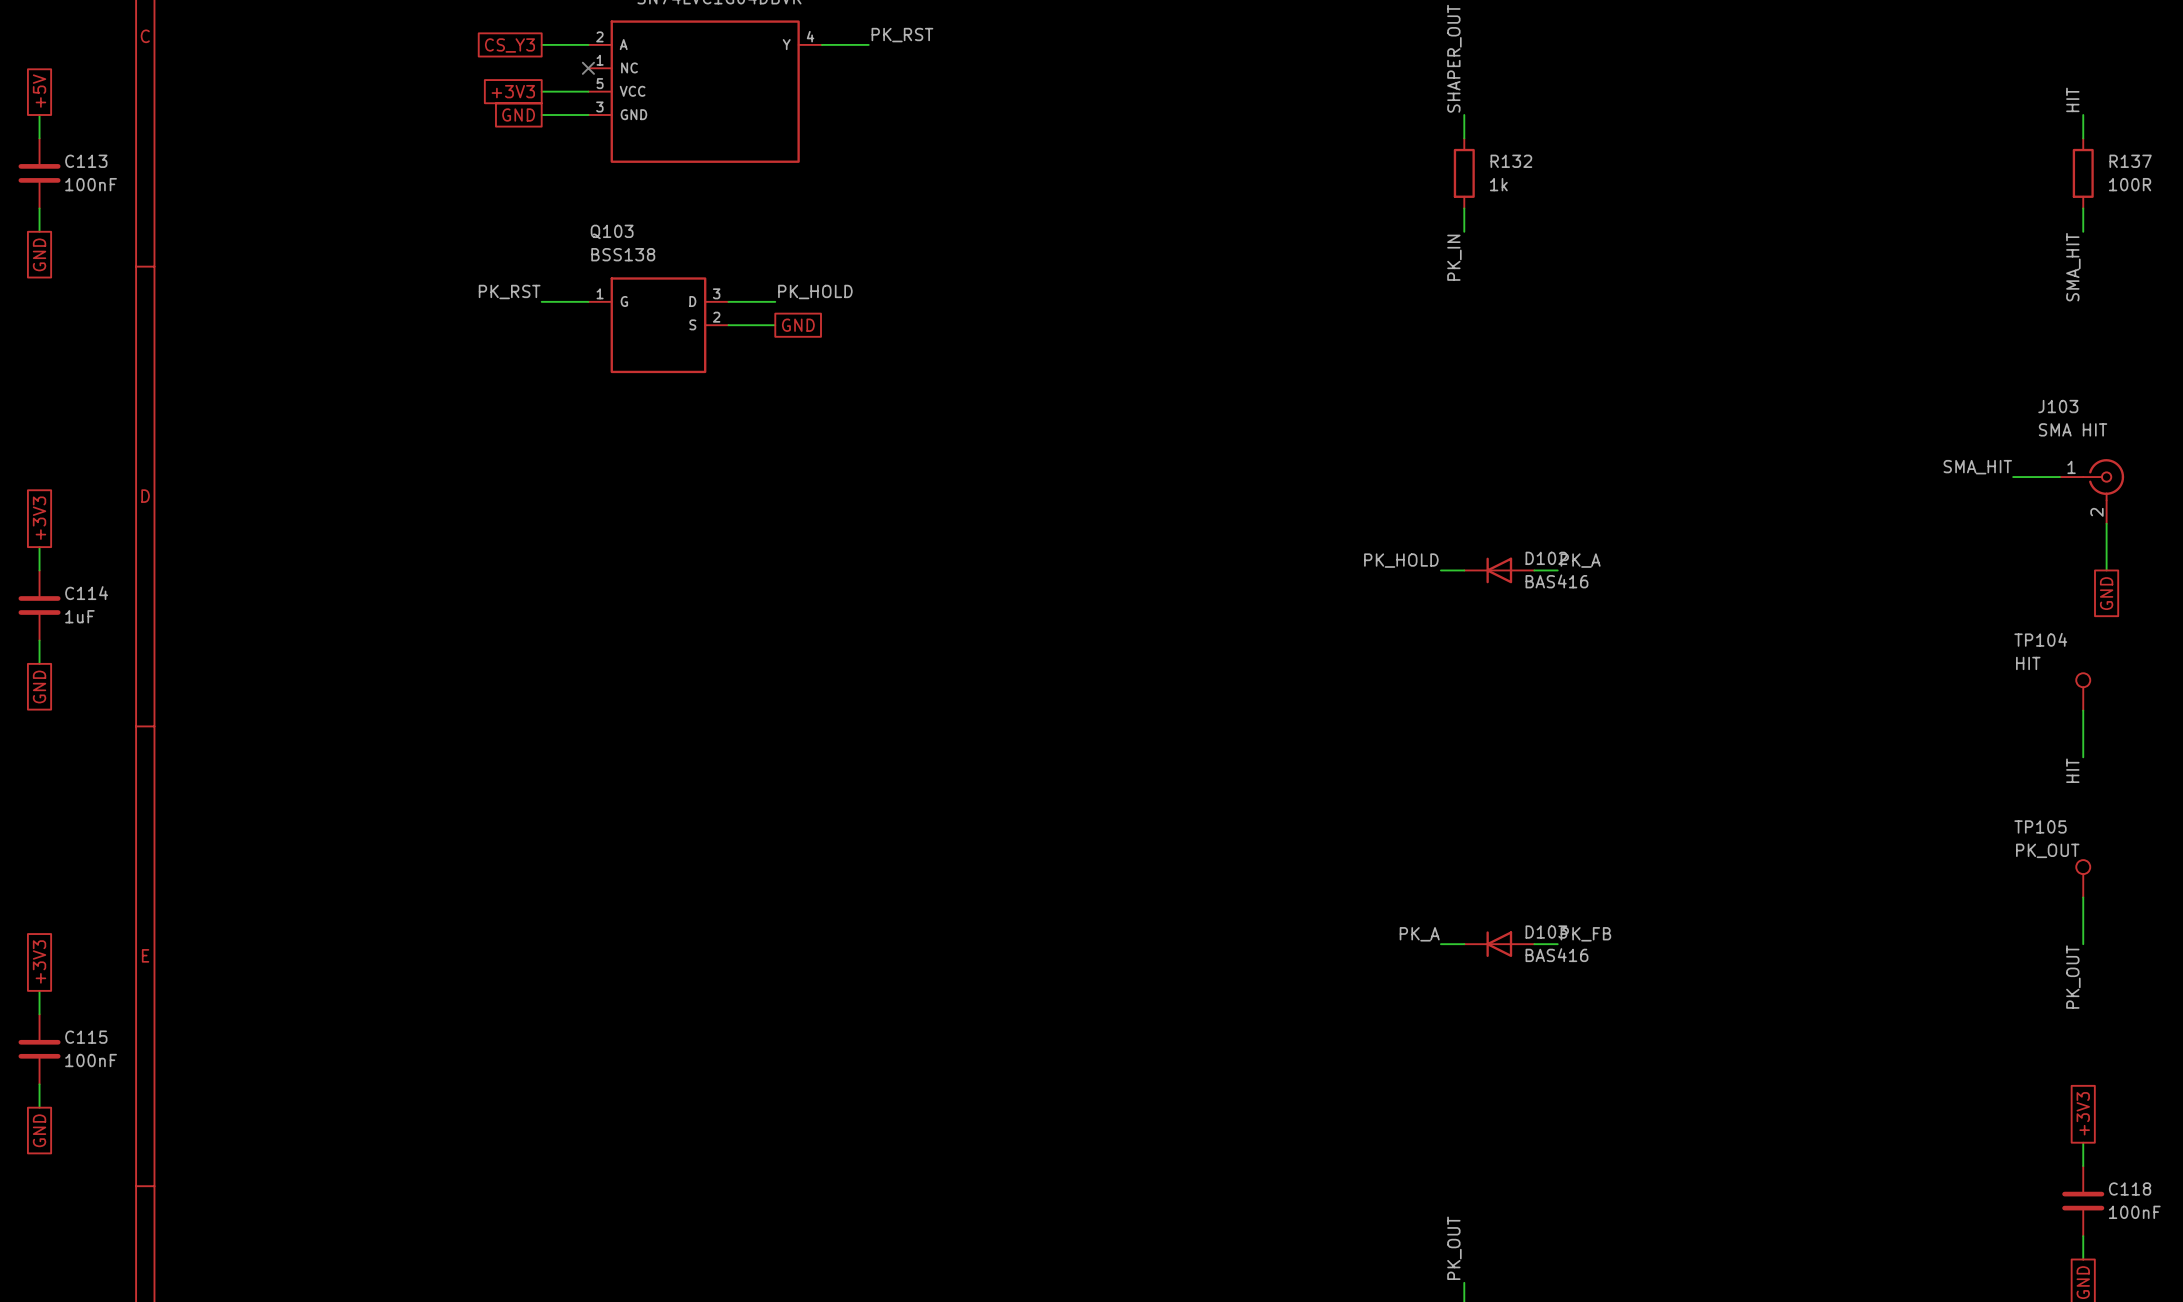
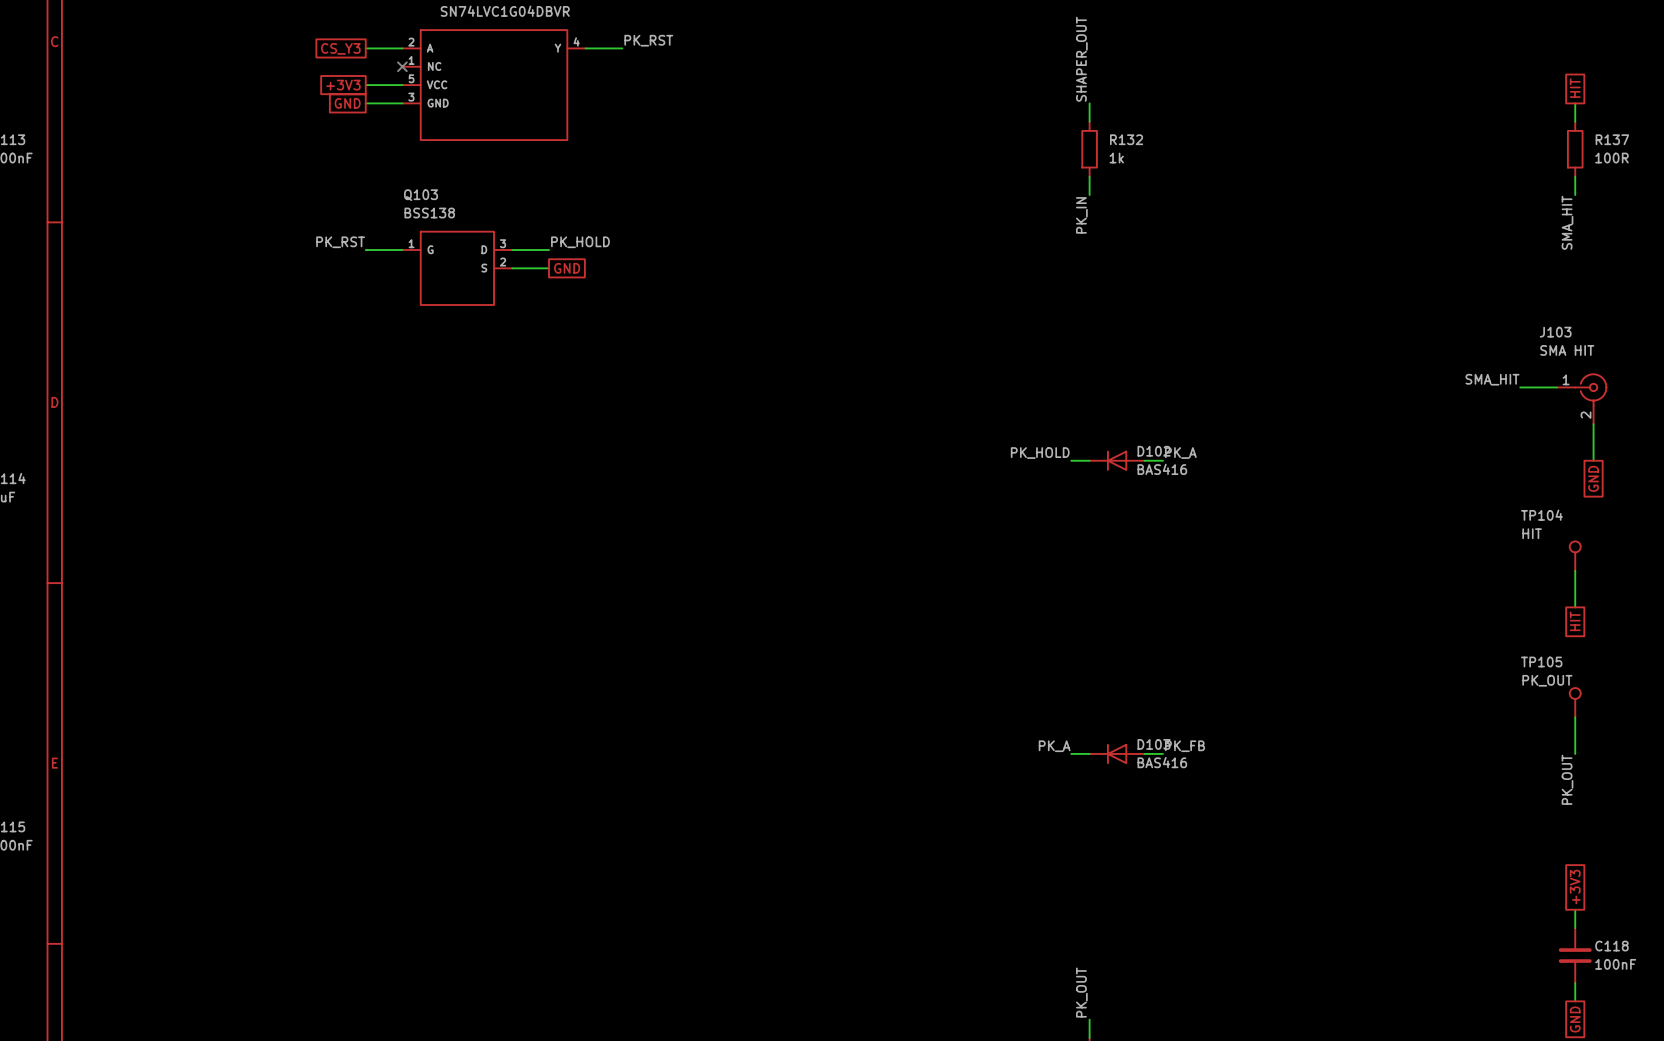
global label: none -> HIT (1575, 88)
label: HIT (2072, 99) -> none
label: HIT (2072, 770) -> none
global label: none -> HIT (1575, 621)

